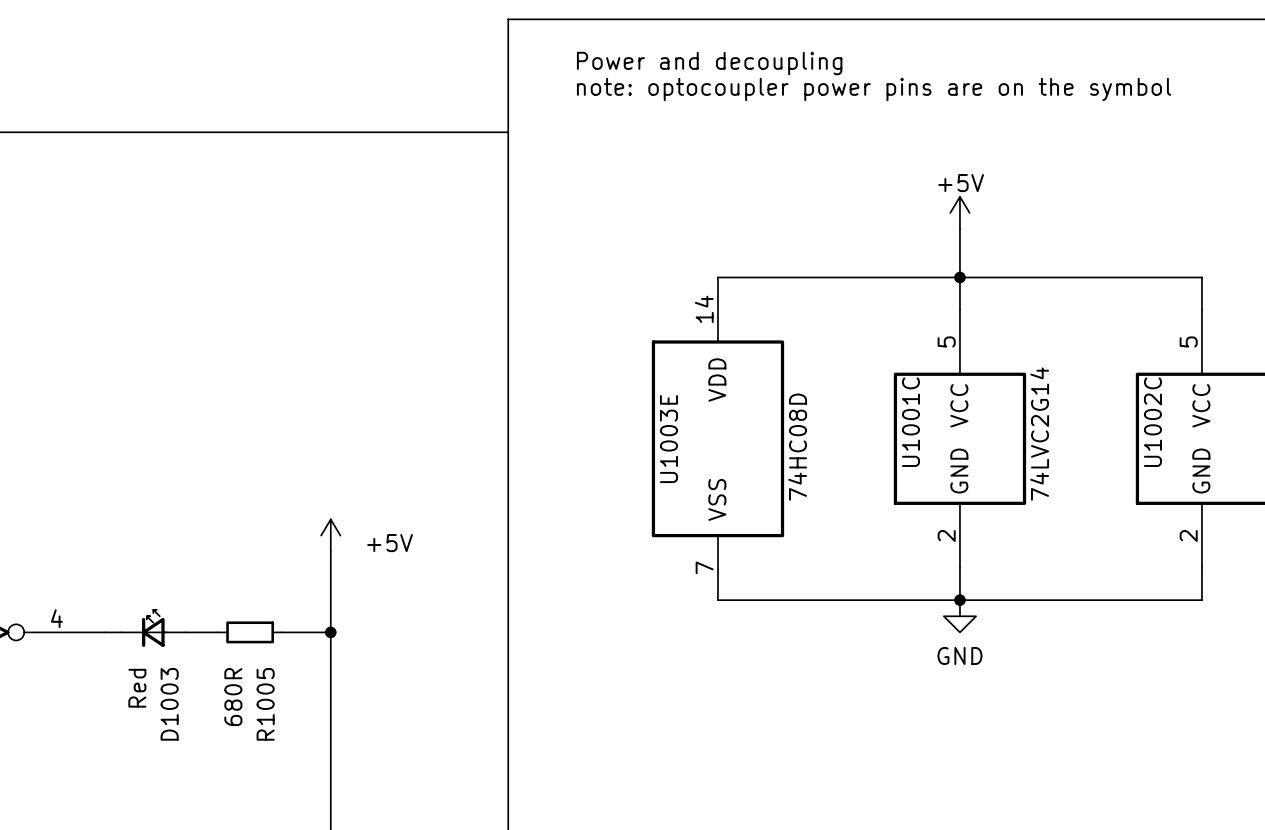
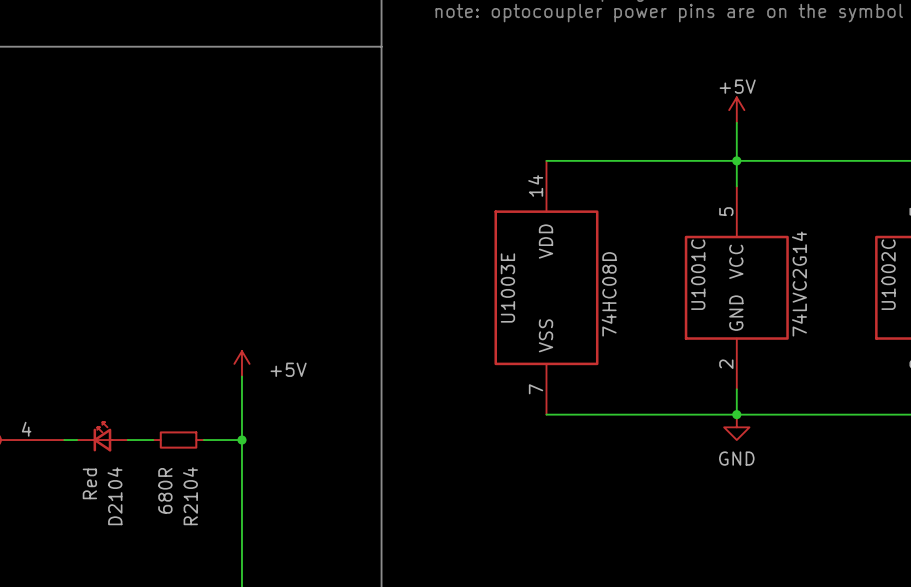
D1003 name: D1003 (169, 704) -> D2104 (114, 496)
R1005 name: R1005 (265, 704) -> R2104 (190, 496)

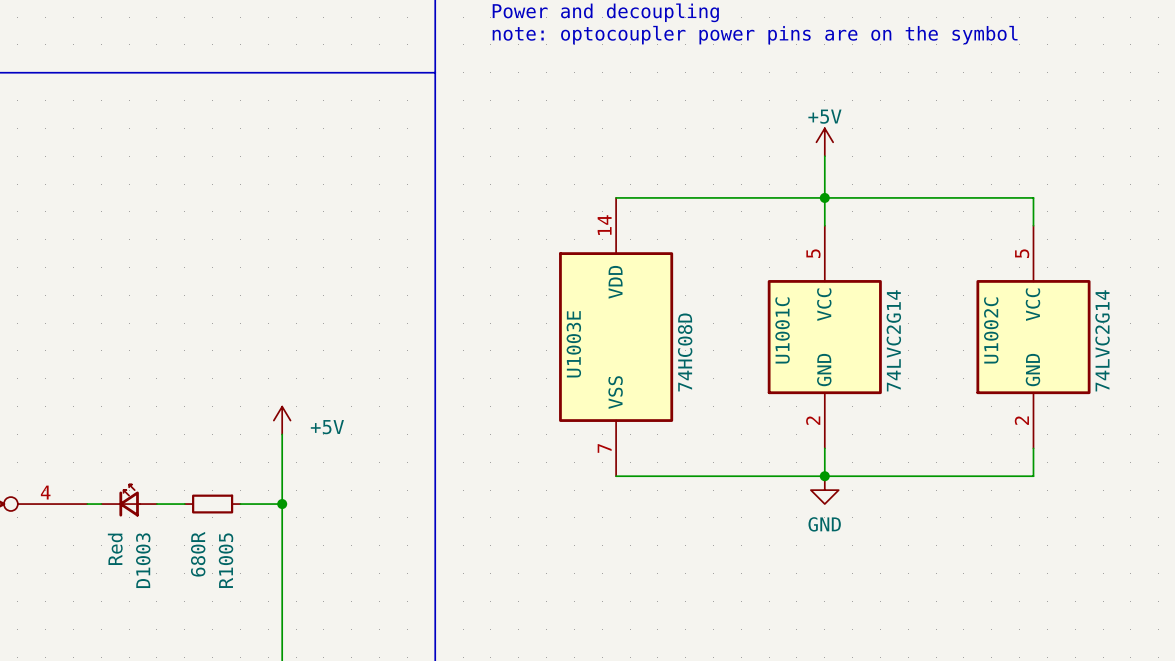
D2104 name: D2104 (114, 496) -> D1003 (143, 560)
R2104 name: R2104 (190, 496) -> R1005 (226, 560)

